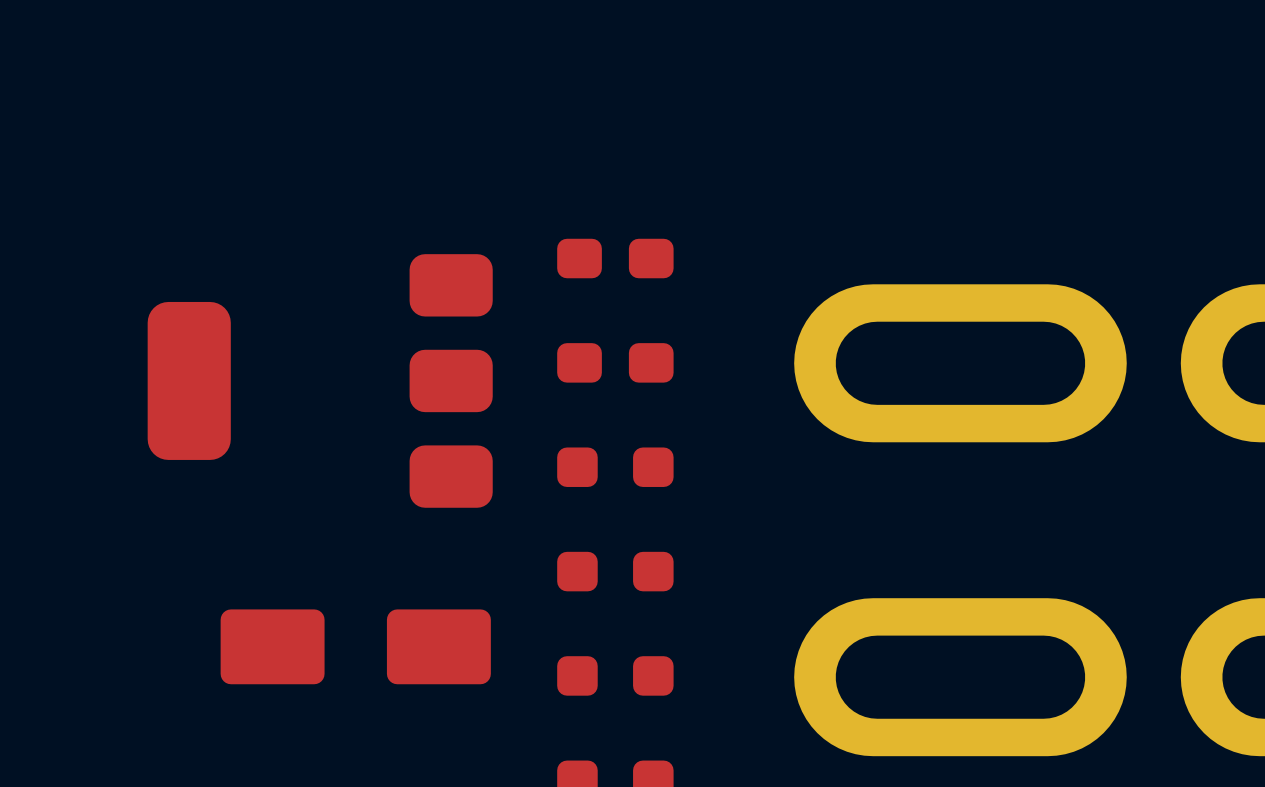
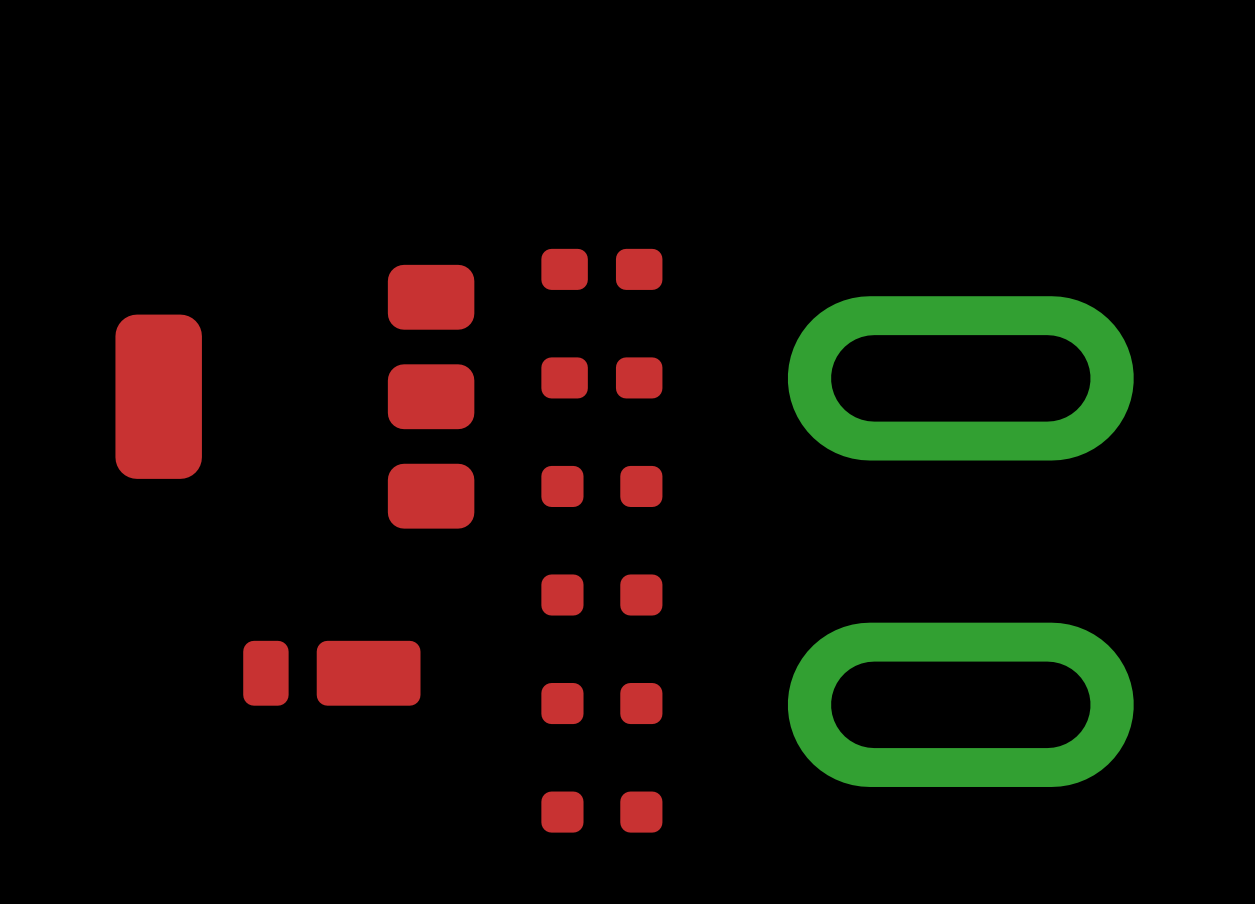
part footprint: [220, 609, 491, 685] -> [243, 640, 421, 706]

